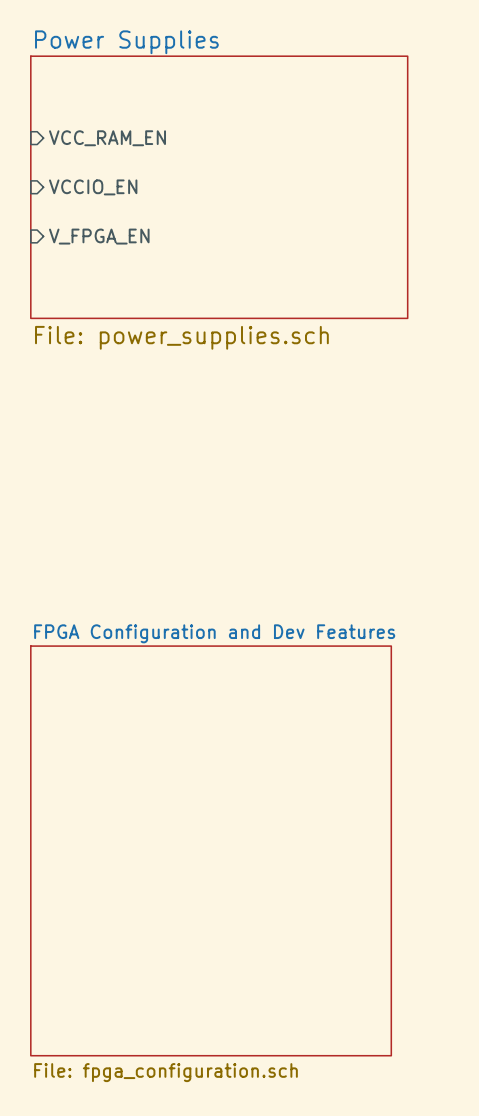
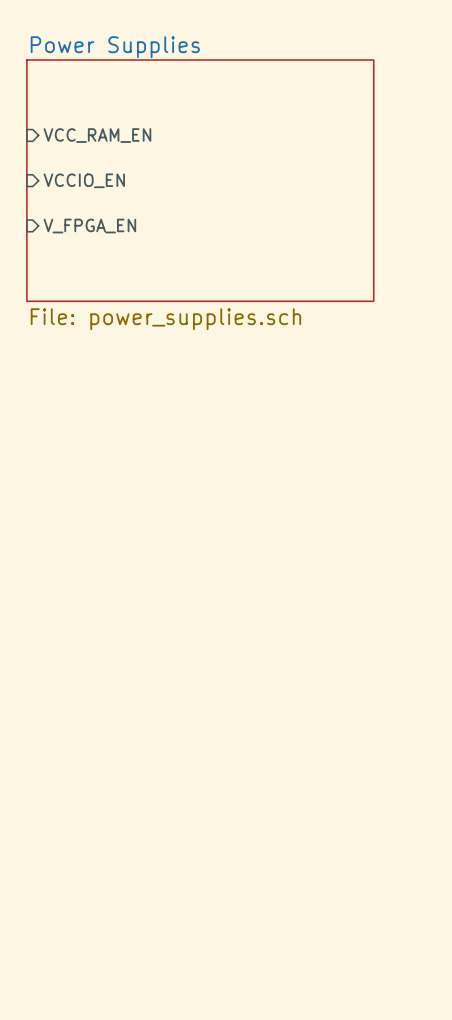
sheet FPGA Configuration and Dev Features: File: fpga_configuration.sch (211, 850) -> none

